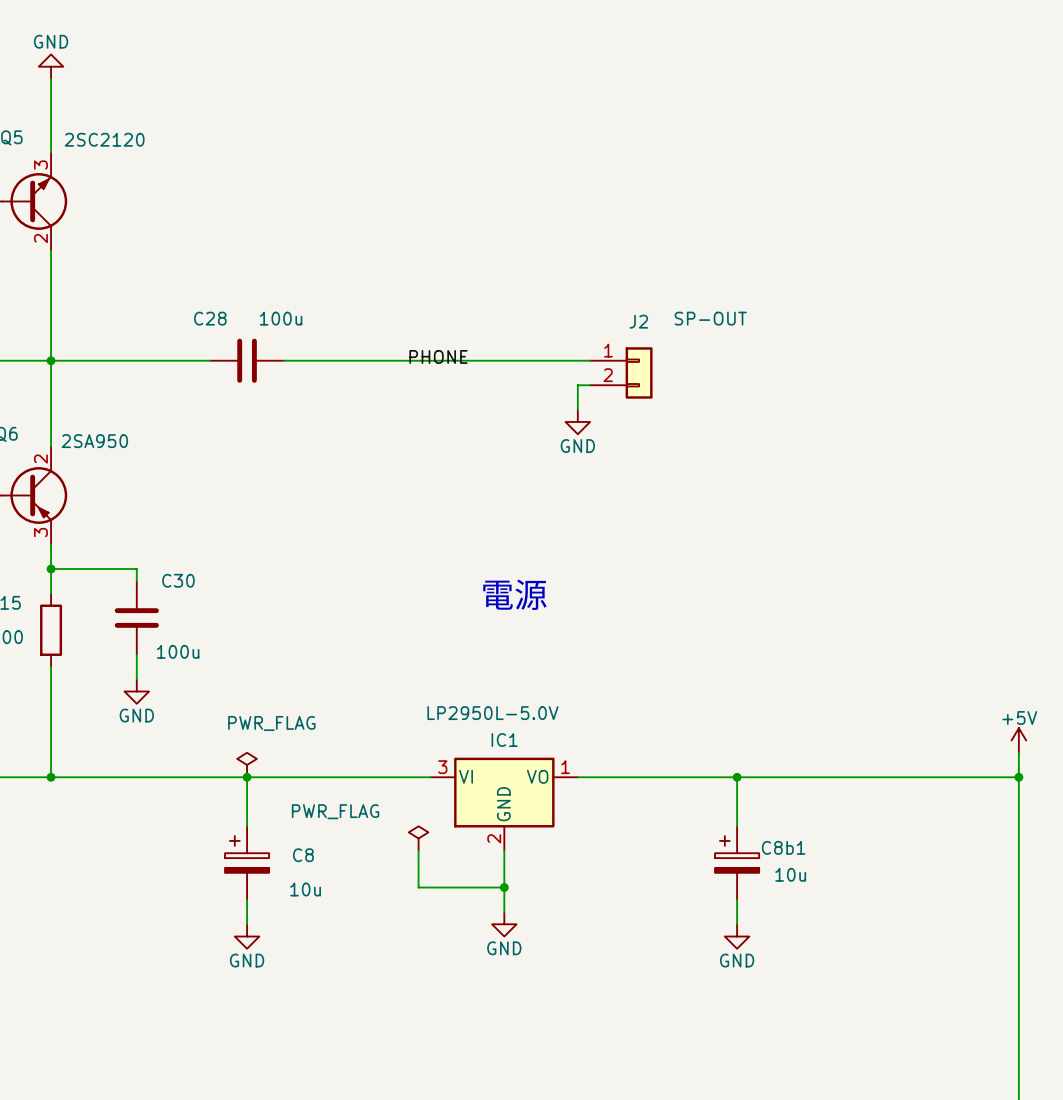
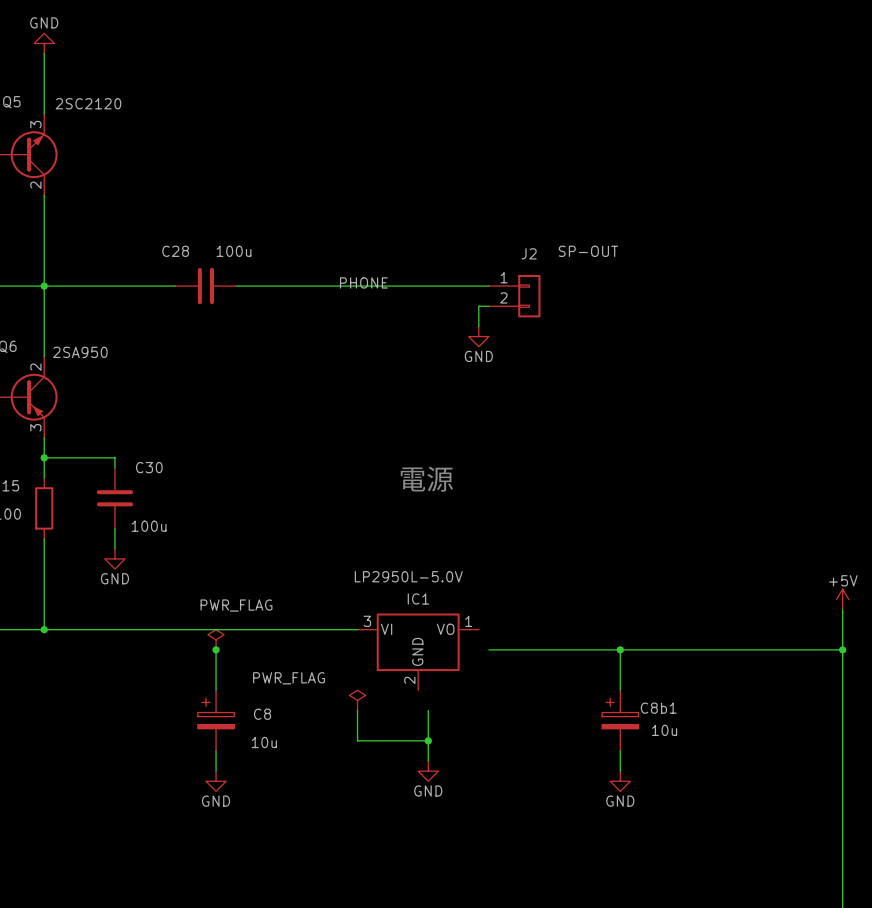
power symbol position: PWR_FLAG (247, 765) -> PWR_FLAG (216, 639)
wire: (247, 777) (247, 826) -> (216, 649) (216, 690)
junction position: (247, 777) -> (216, 649)
wire: (577, 777) (1018, 777) -> none
wire: (737, 777) (737, 826) -> (620, 649) (620, 690)
junction position: (737, 777) -> (620, 649)
junction position: (1018, 777) -> (842, 649)
wire: none -> (488, 649) (842, 649)
power symbol position: PWR_FLAG (418, 838) -> PWR_FLAG (357, 700)
wire: (418, 850) (418, 887) (504, 887) -> (357, 710) (357, 740) (428, 740)
wire: (504, 850) (504, 912) -> (428, 710) (428, 761)
C8 position: (247, 863) -> (216, 720)
C8b1 position: (737, 863) -> (620, 720)
junction position: (504, 887) -> (428, 740)
wire: (247, 899) (247, 924) -> (216, 750) (216, 771)
wire: (737, 899) (737, 924) -> (620, 750) (620, 771)
power symbol position: GND (504, 924) -> GND (428, 771)
power symbol position: GND (247, 936) -> GND (216, 781)
power symbol position: GND (737, 936) -> GND (620, 781)

